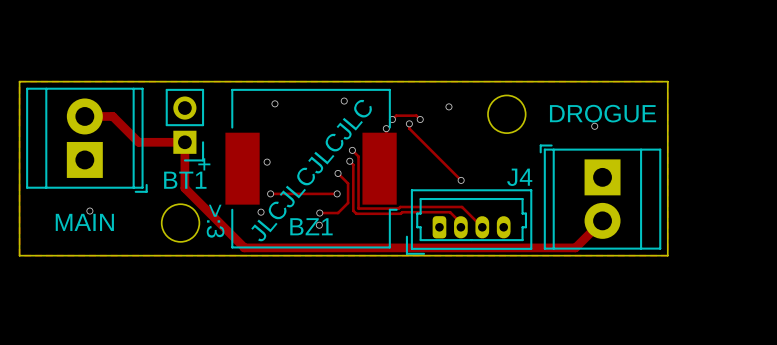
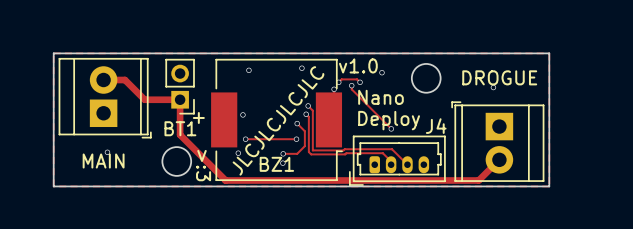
text: none -> v1.0 (358, 65)
text: none -> Nano (380, 97)
text: none -> Deploy (389, 120)

